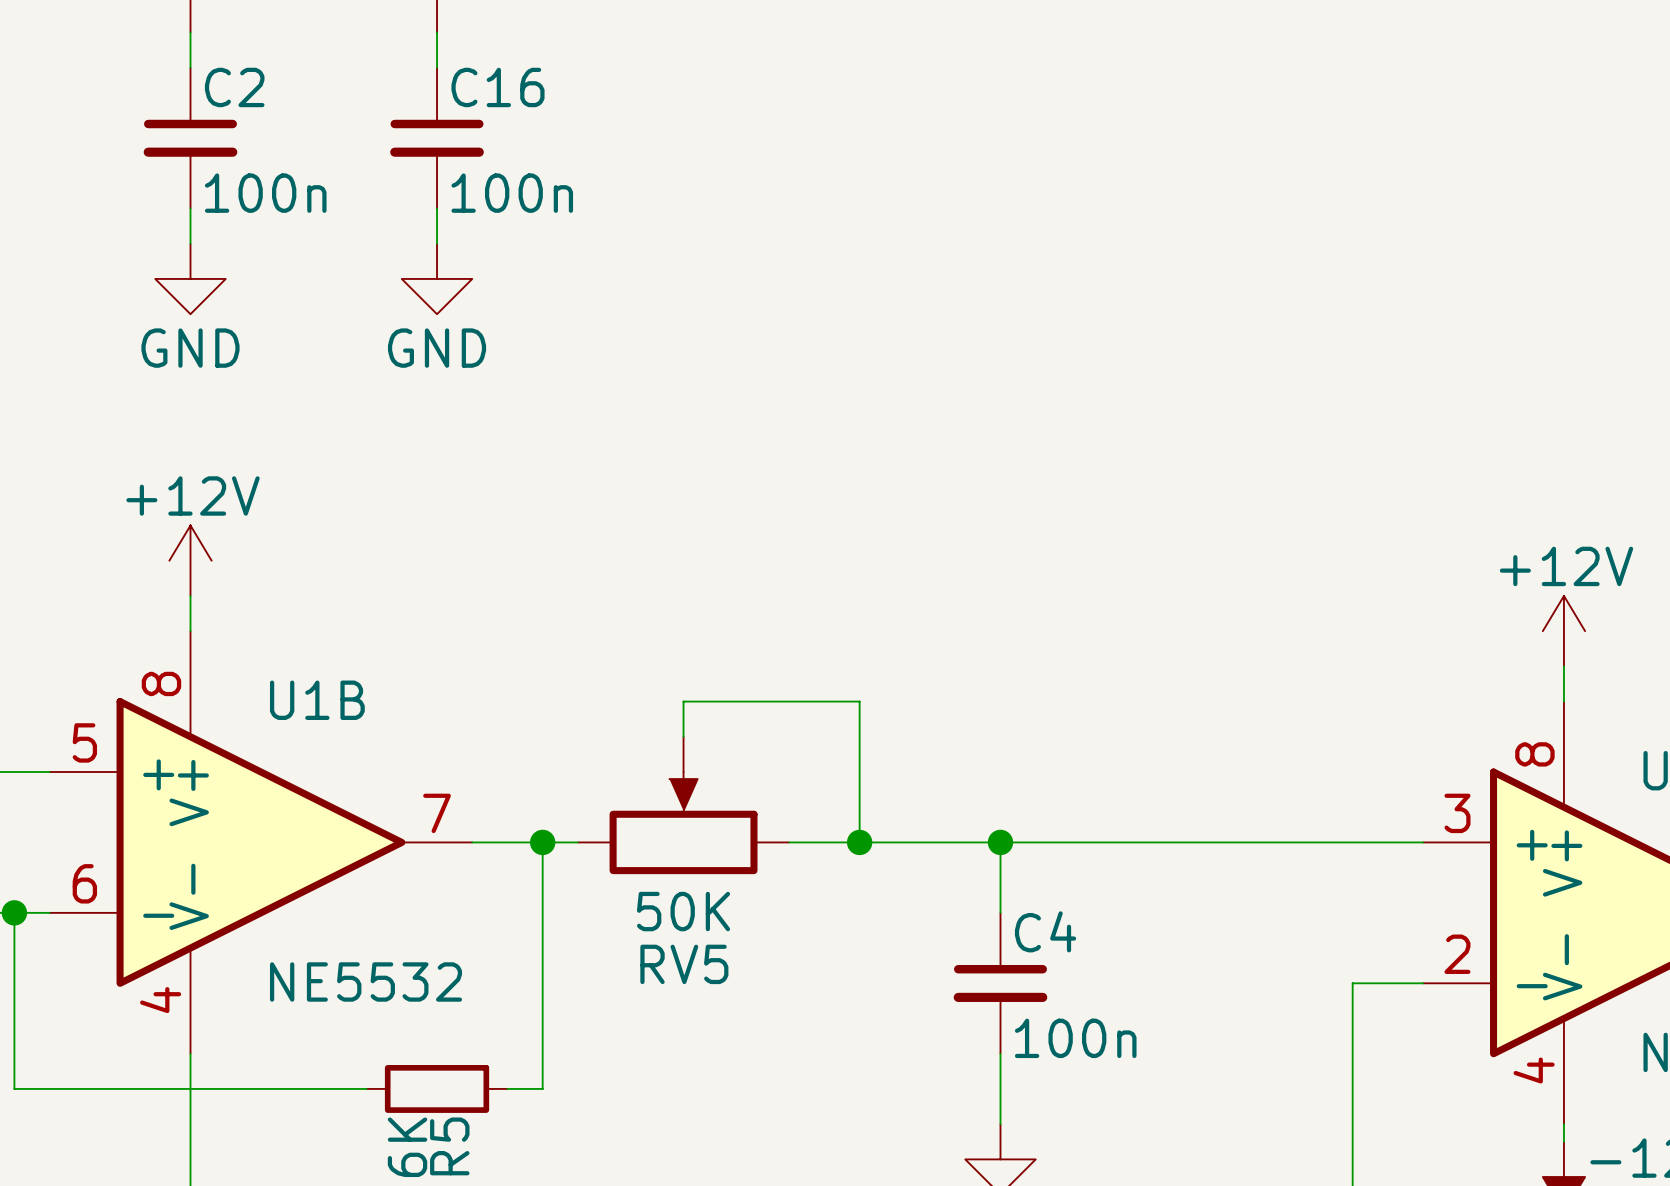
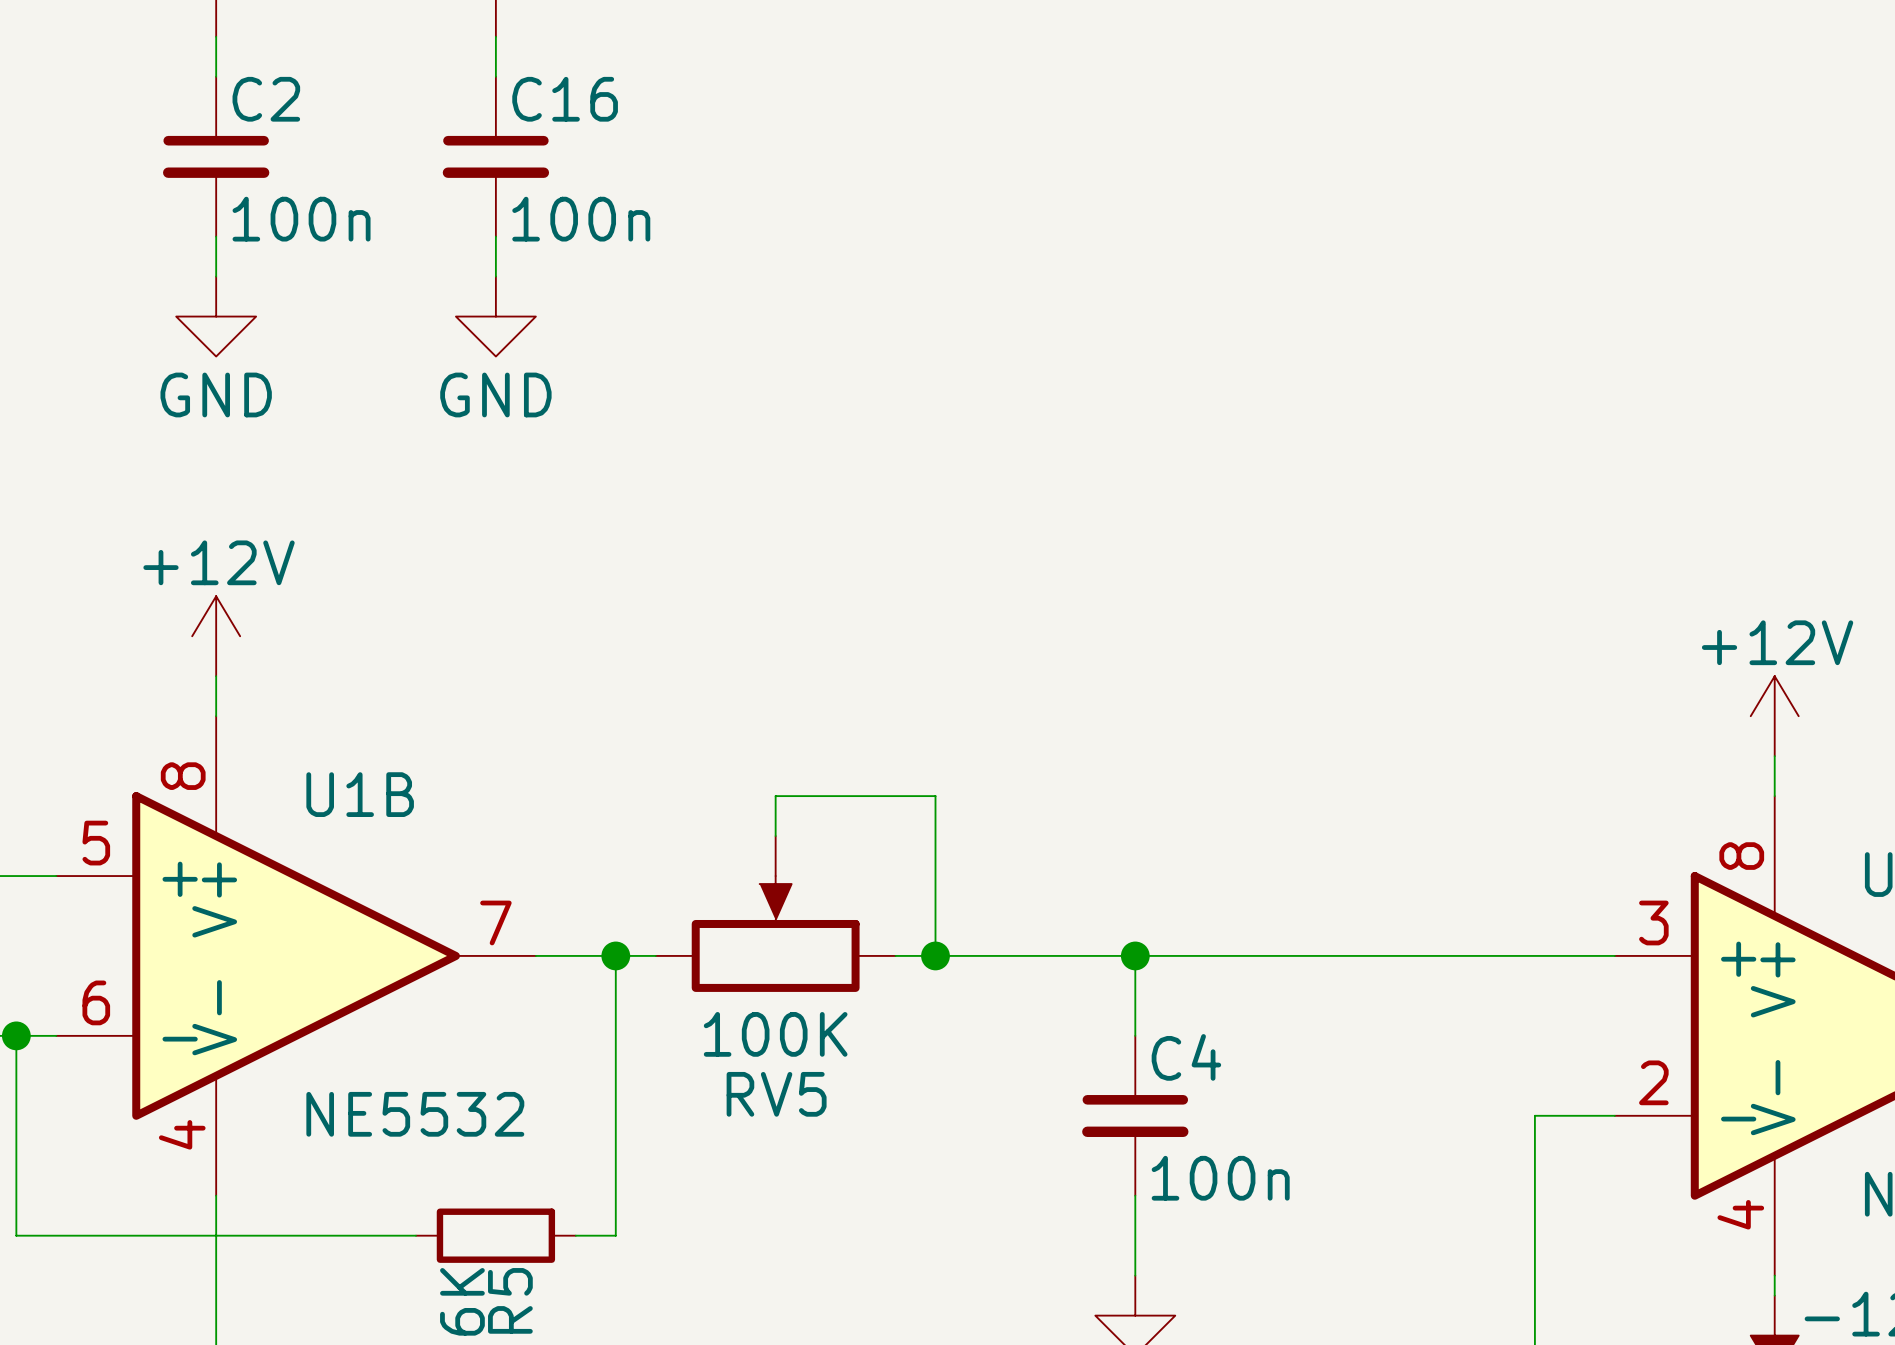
wire: (824, 701) (859, 701) (859, 842) -> (935, 796) (935, 955)
junction position: (859, 842) -> (935, 955)
RV5 value: 50K (683, 911) -> 100K (775, 1034)

